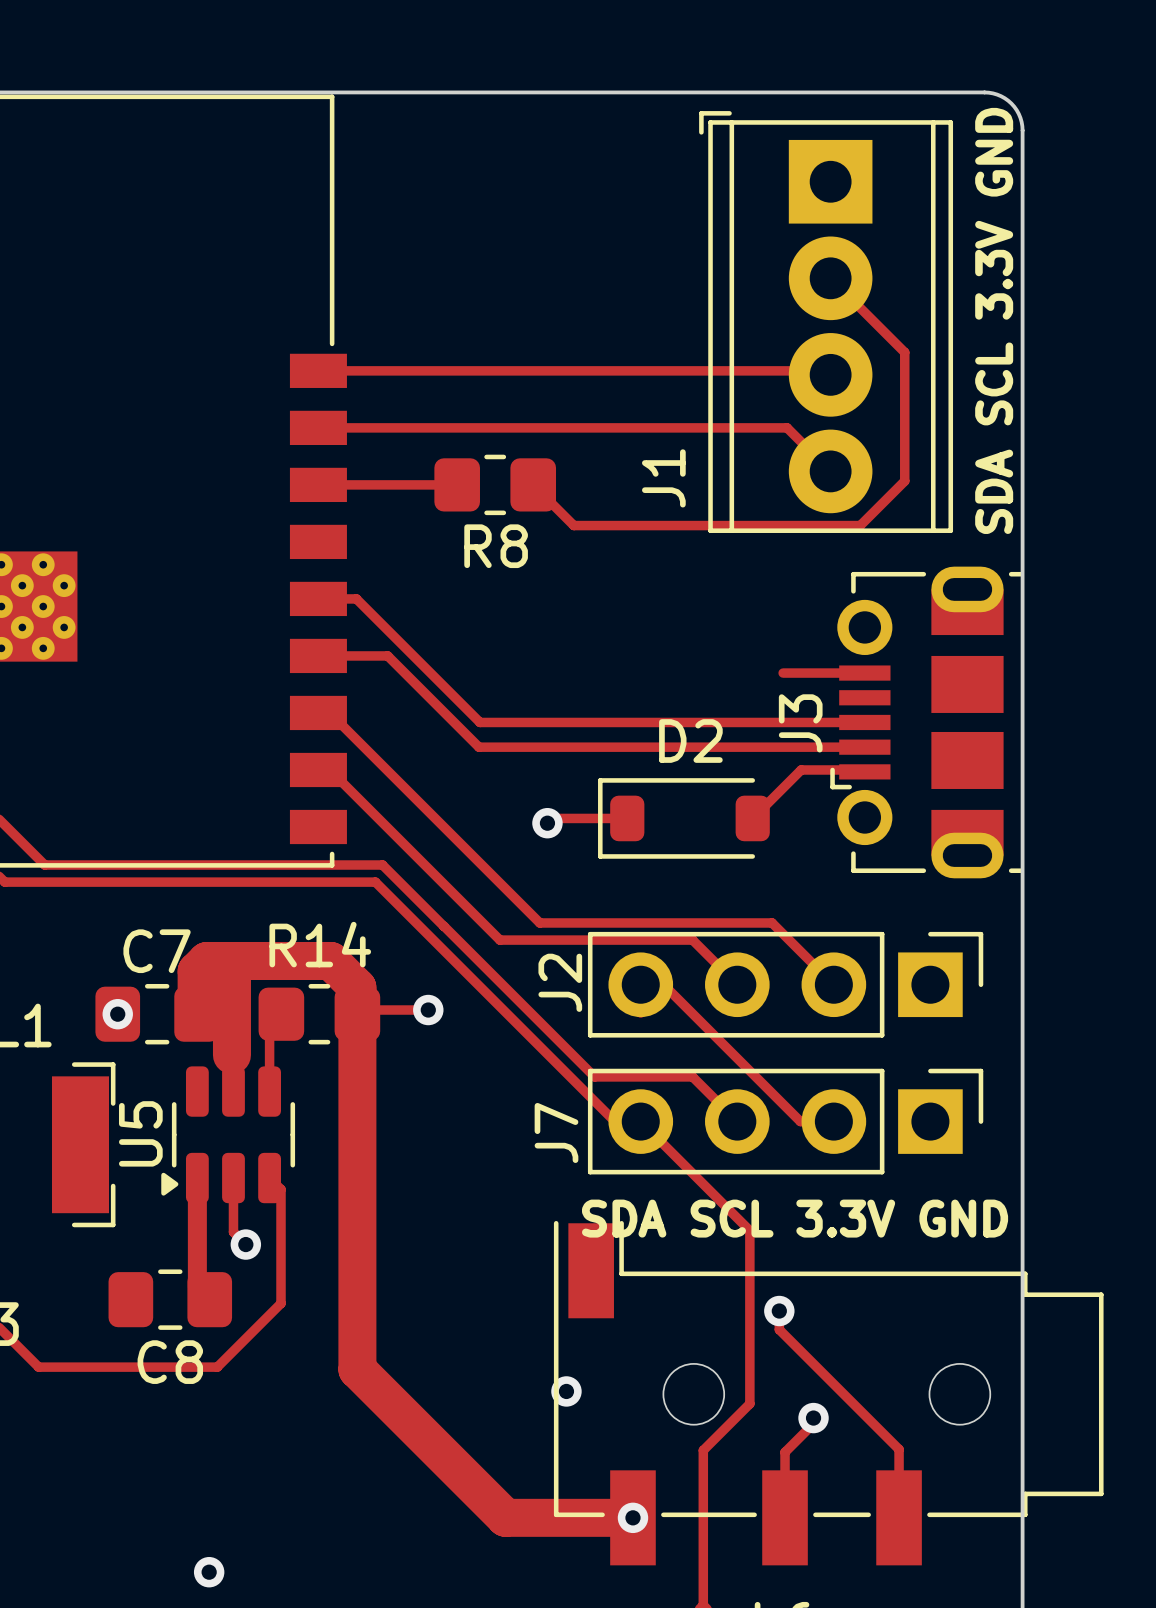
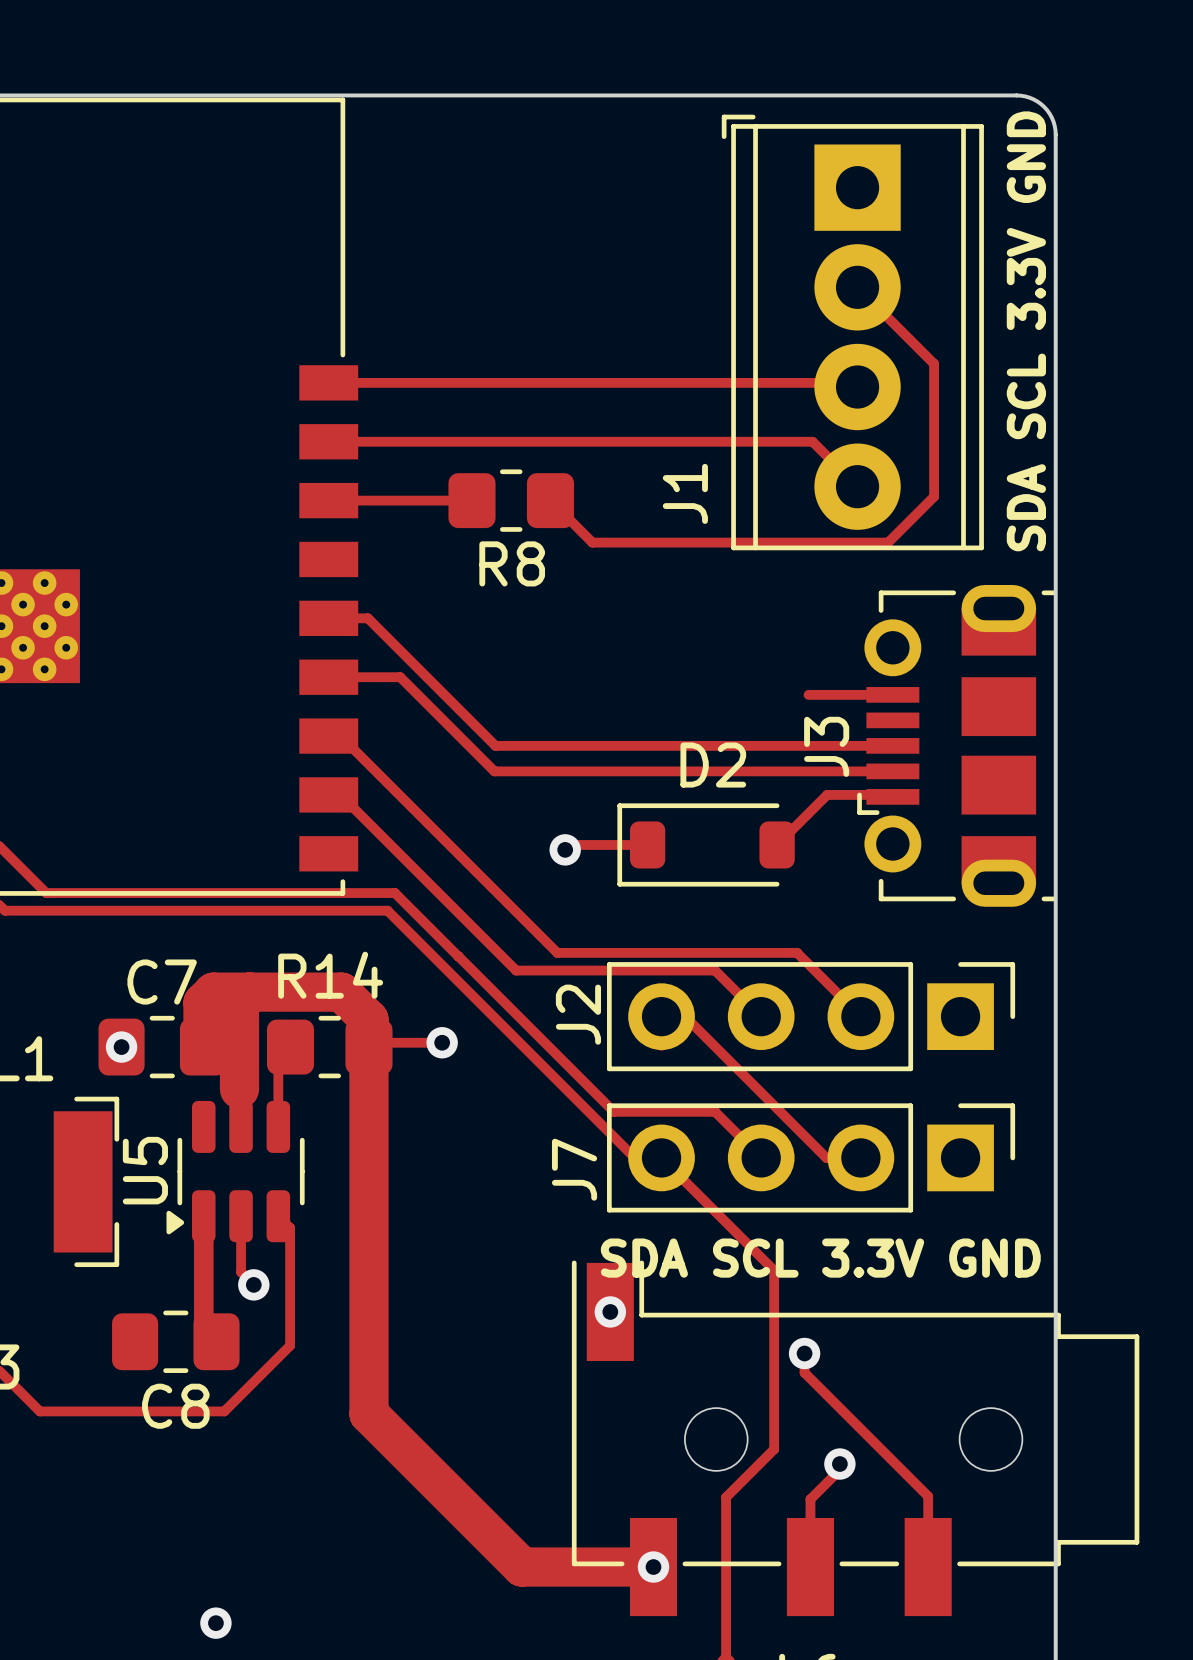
via position: (566, 1391) -> (610, 1311)

